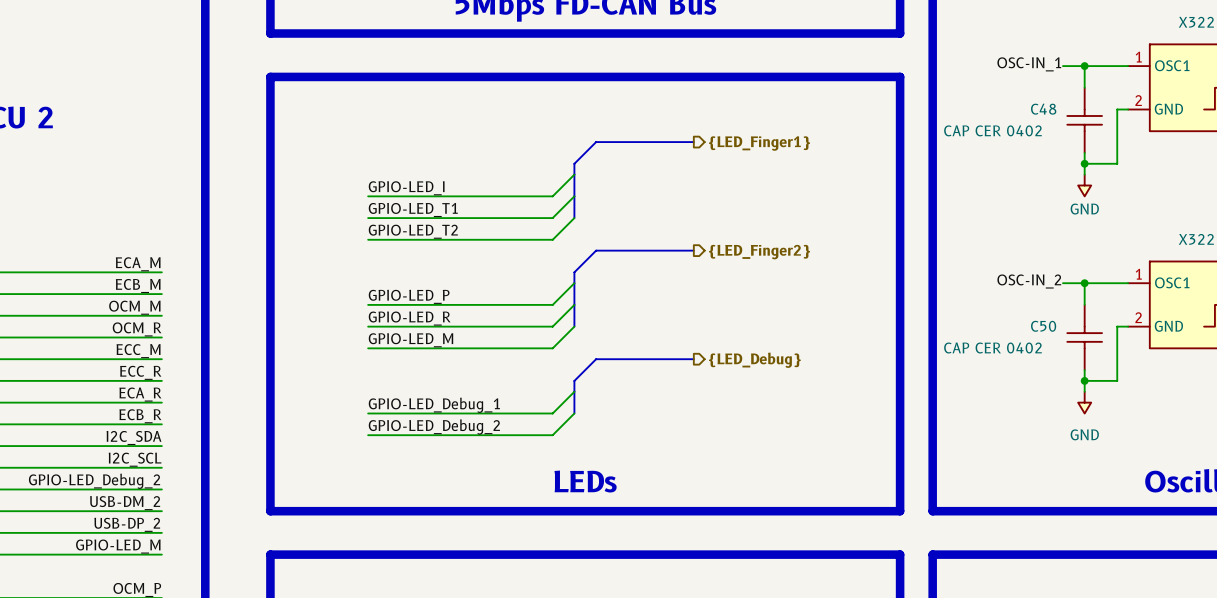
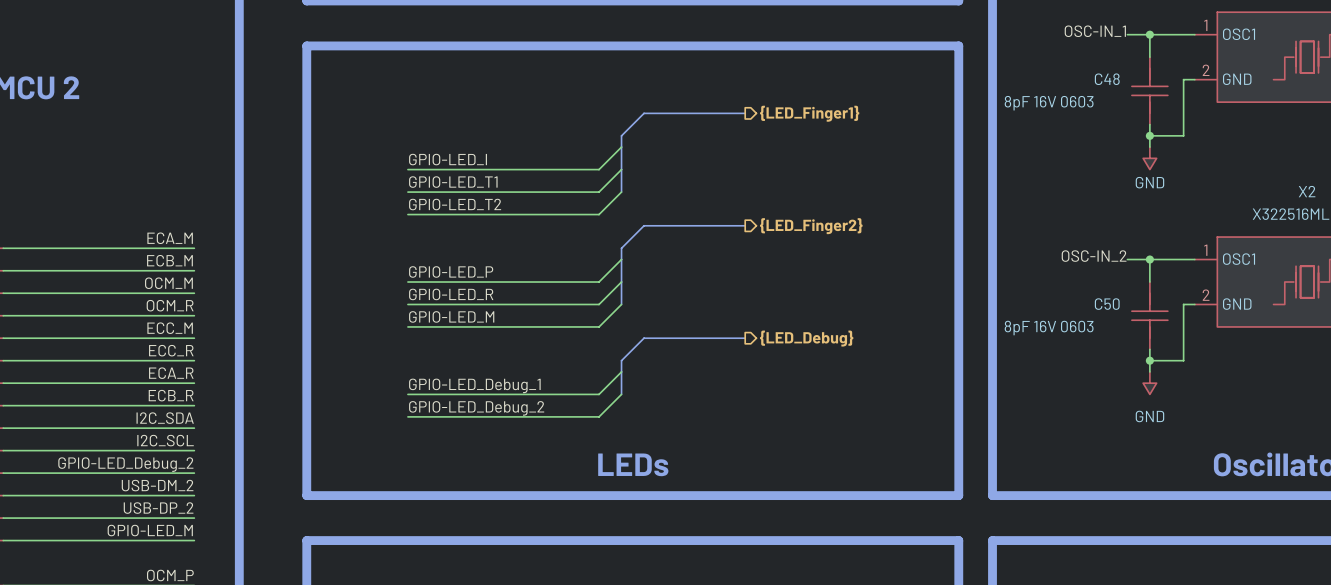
C48 symbol: [1067, 87, 1103, 153] -> [1131, 57, 1168, 125]
C48 value: CAP CER 0402 (992, 130) -> 8pF 16V 0603 (1049, 103)
C50 symbol: [1067, 304, 1103, 371] -> [1131, 282, 1168, 350]
C50 value: CAP CER 0402 (992, 348) -> 8pF 16V 0603 (1049, 328)

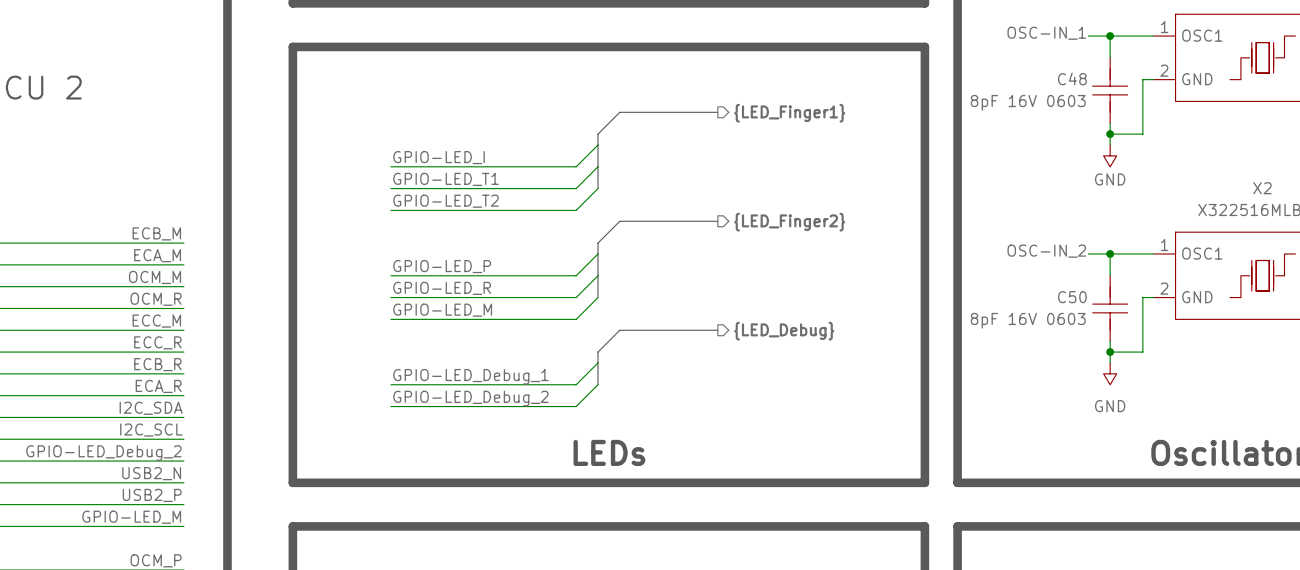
label: ECA_M (170, 238) -> ECB_M (156, 233)
label: ECB_M (169, 260) -> ECA_M (157, 255)
label: ECA_R (171, 373) -> ECB_R (157, 364)
label: ECB_R (171, 395) -> ECA_R (158, 386)
label: USB-DM_2 (157, 485) -> USB2_N (151, 473)
label: USB-DP_2 (158, 508) -> USB2_P (152, 495)

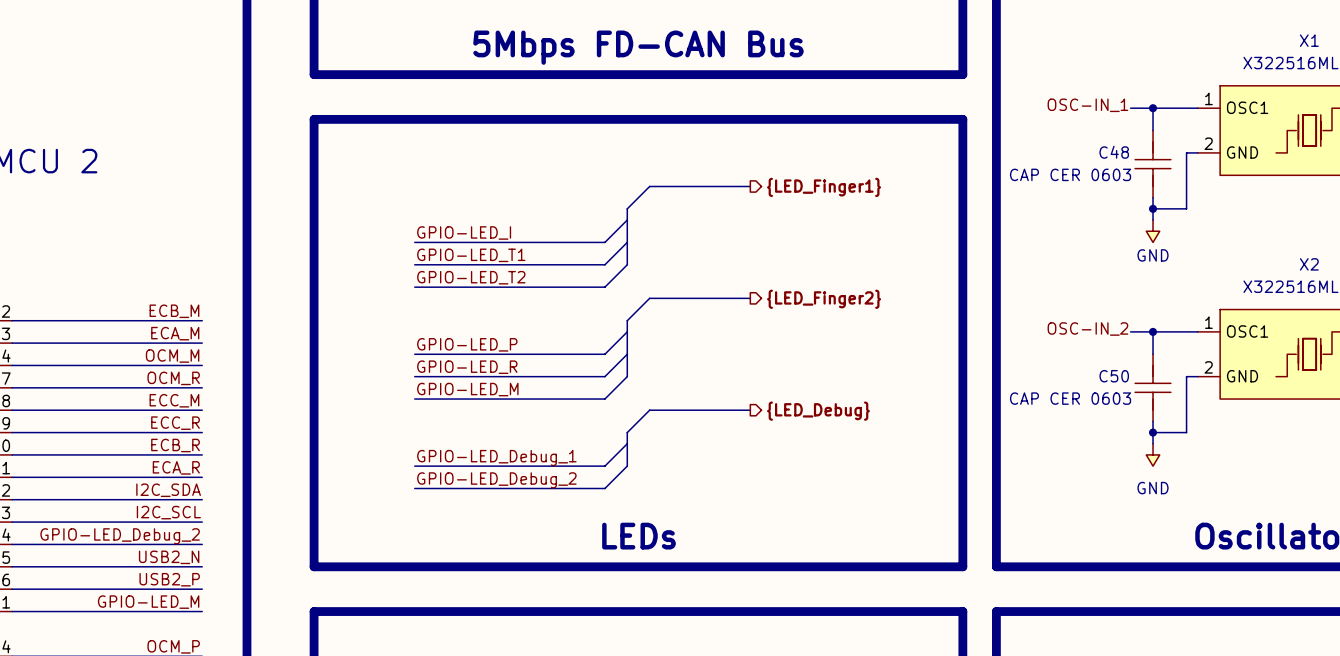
C48 value: 8pF 16V 0603 (1028, 102) -> CAP CER 0603 (1070, 174)
C50 value: 8pF 16V 0603 (1028, 320) -> CAP CER 0603 (1070, 398)

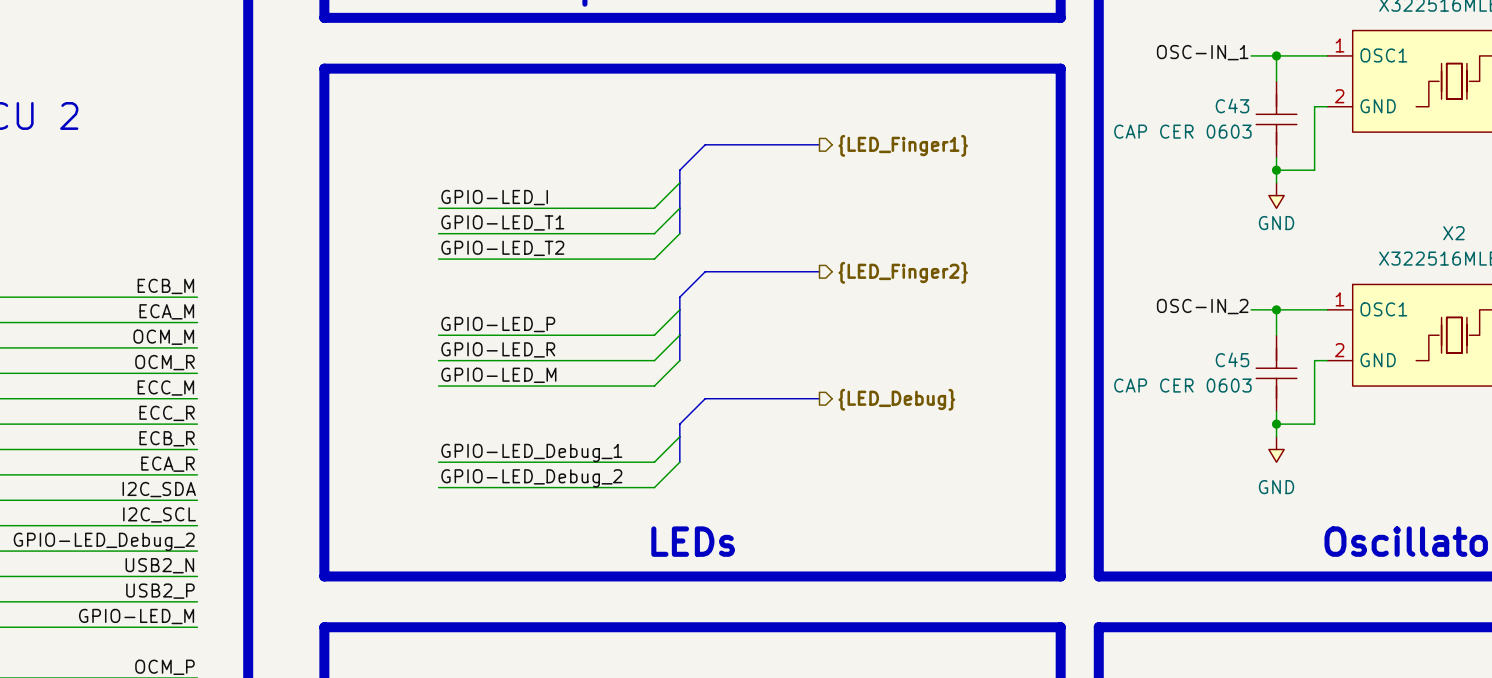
C48 name: C48 (1114, 152) -> C43 (1232, 105)
C50 name: C50 (1114, 376) -> C45 (1232, 359)

